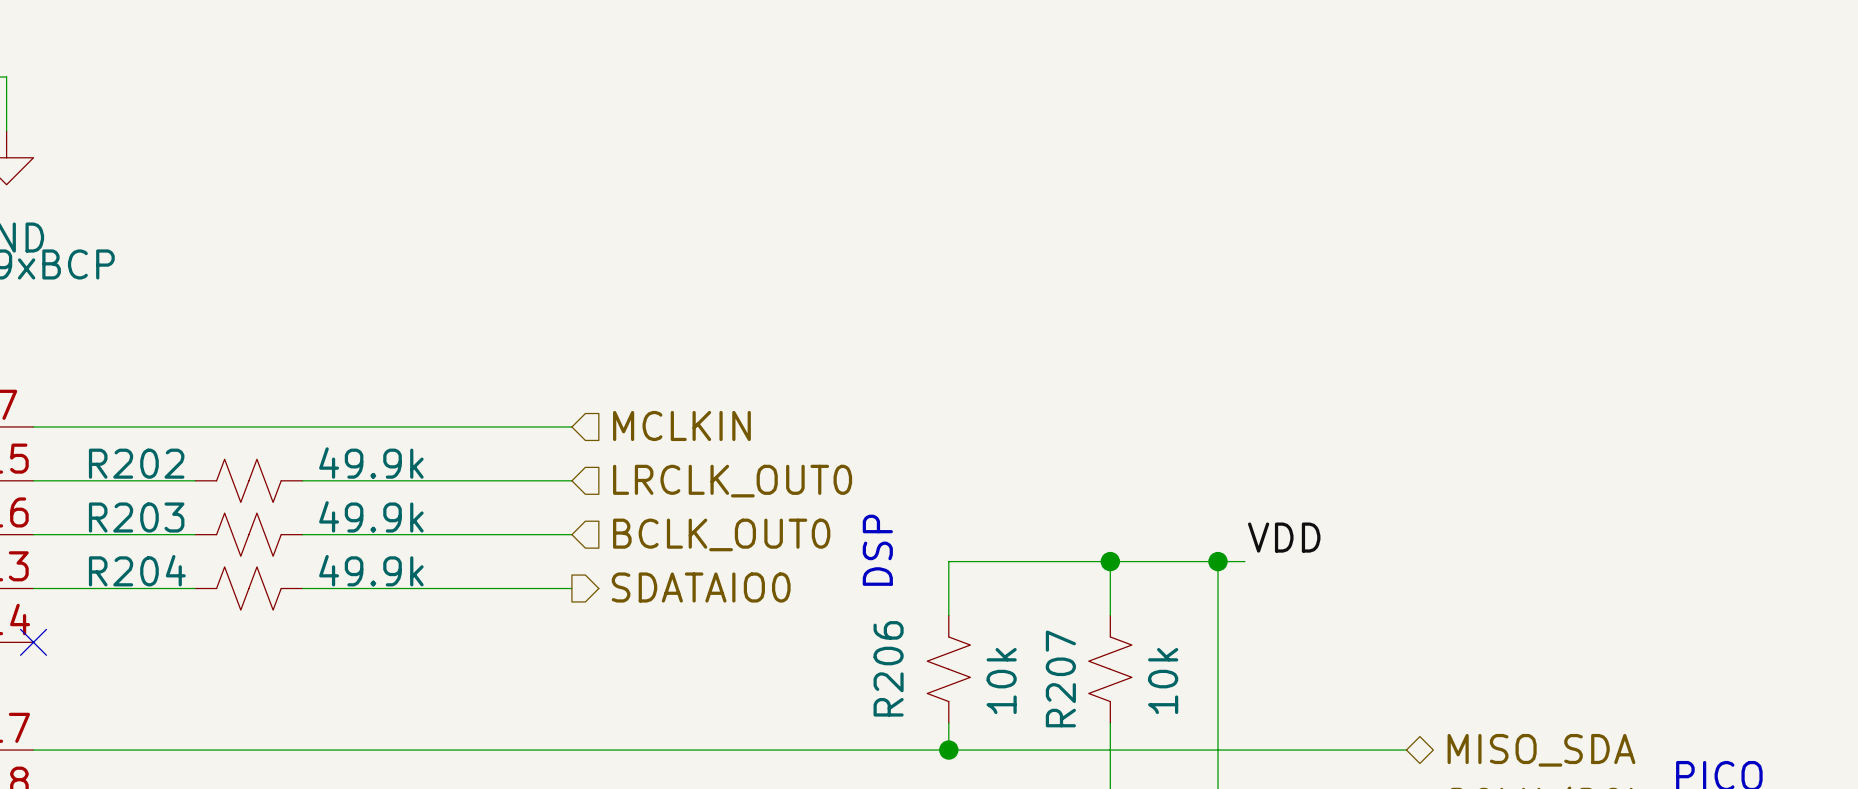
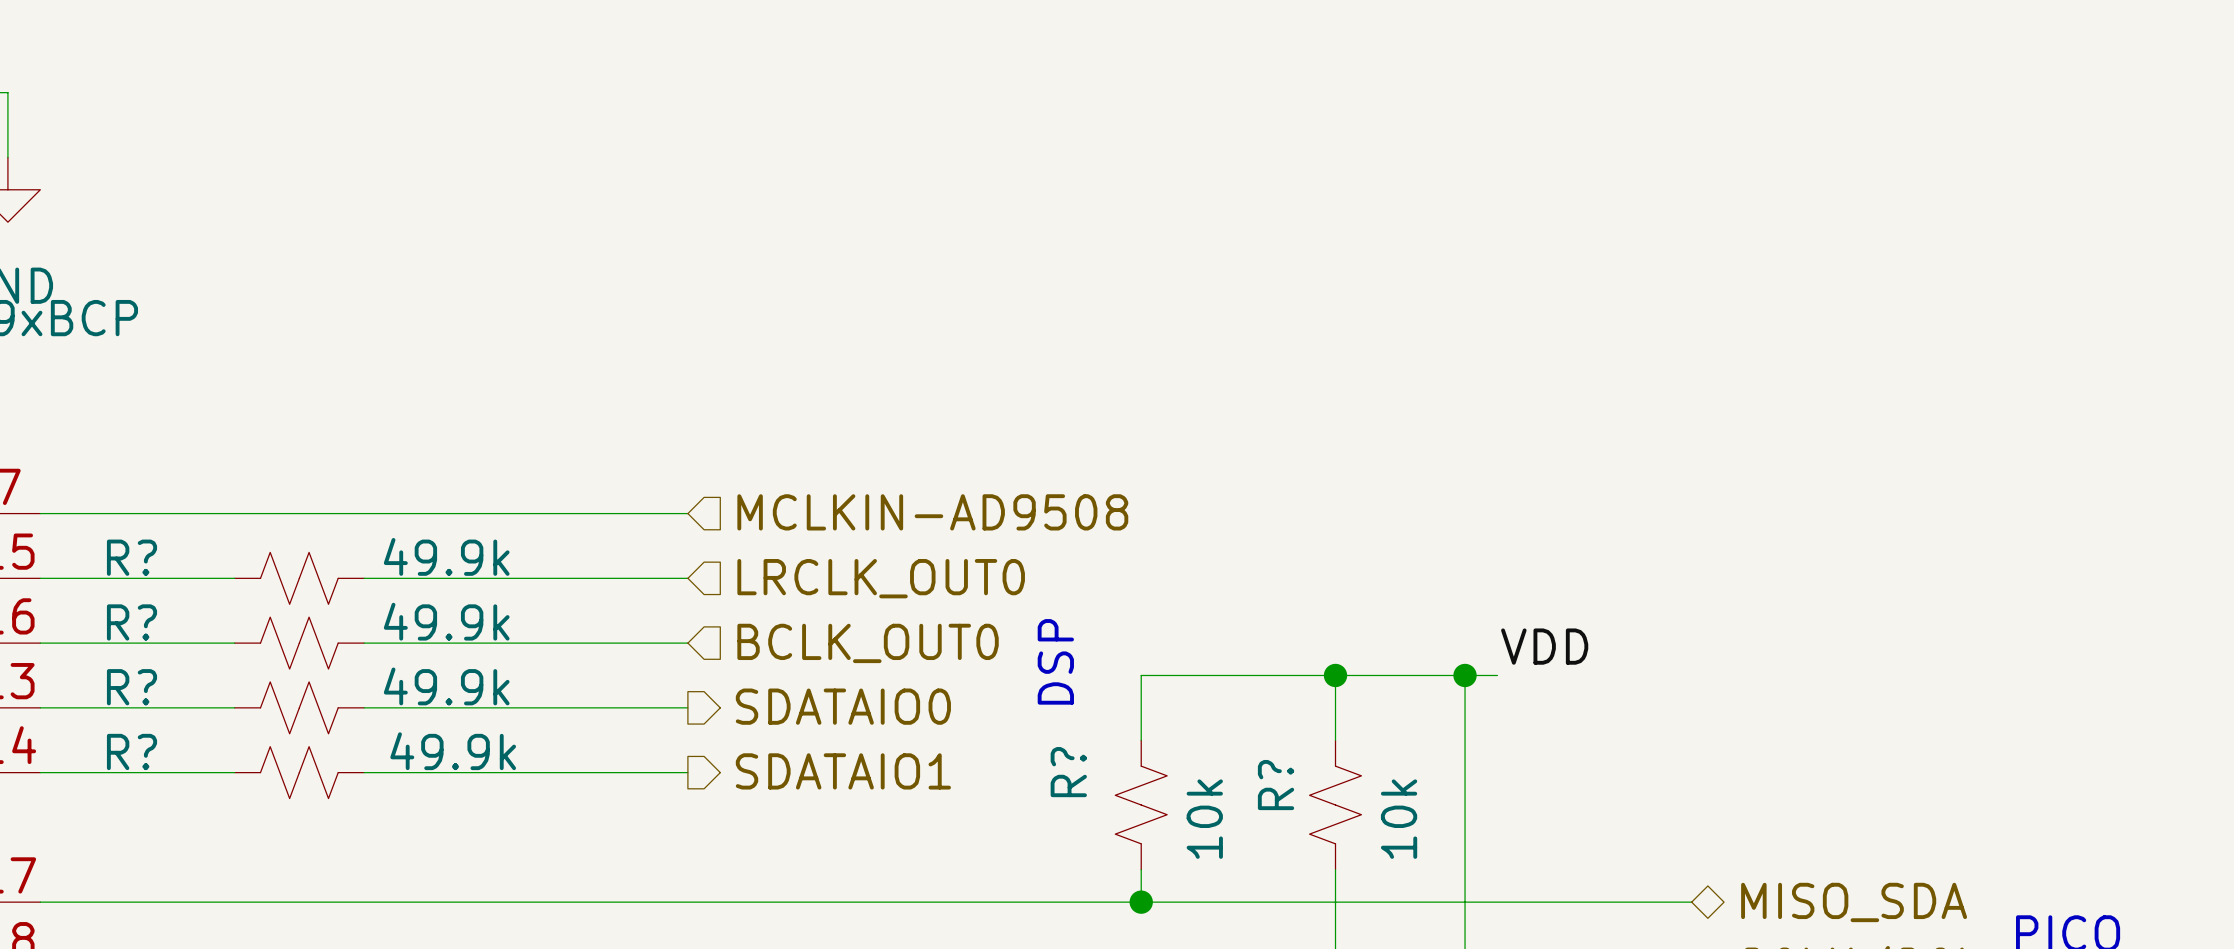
hierarchical label: MCLKIN (681, 425) -> MCLKIN-AD9508 (932, 512)
R202 name: R202 (136, 463) -> R? (132, 557)
R203 name: R203 (136, 517) -> R? (132, 622)
R204 name: R204 (137, 570) -> R? (132, 687)
hierarchical label: none -> SDATAIO1 (843, 771)
wire: none -> (40, 772) (234, 772)
no-connect mark: (33, 642) -> none
R?: none -> 49.9k (299, 772)
wire: none -> (364, 772) (687, 772)
R206 name: R206 (888, 668) -> R? (1068, 772)
R207 name: R207 (1060, 678) -> R? (1276, 785)

